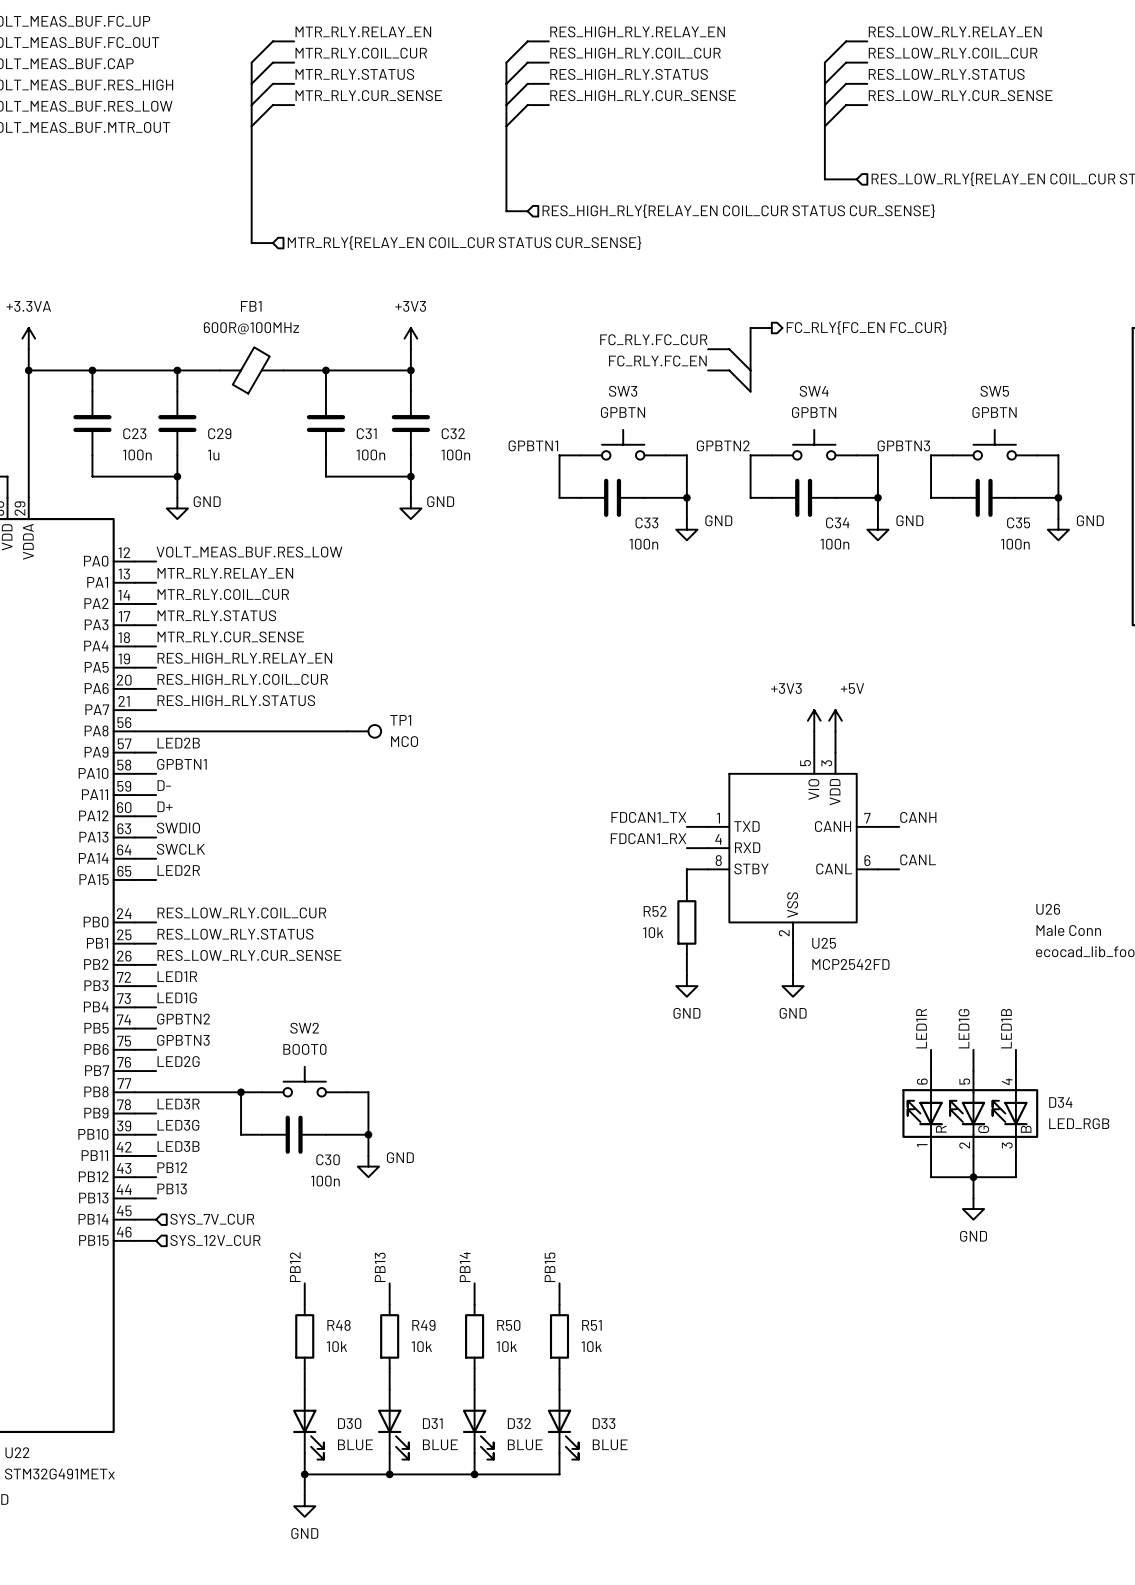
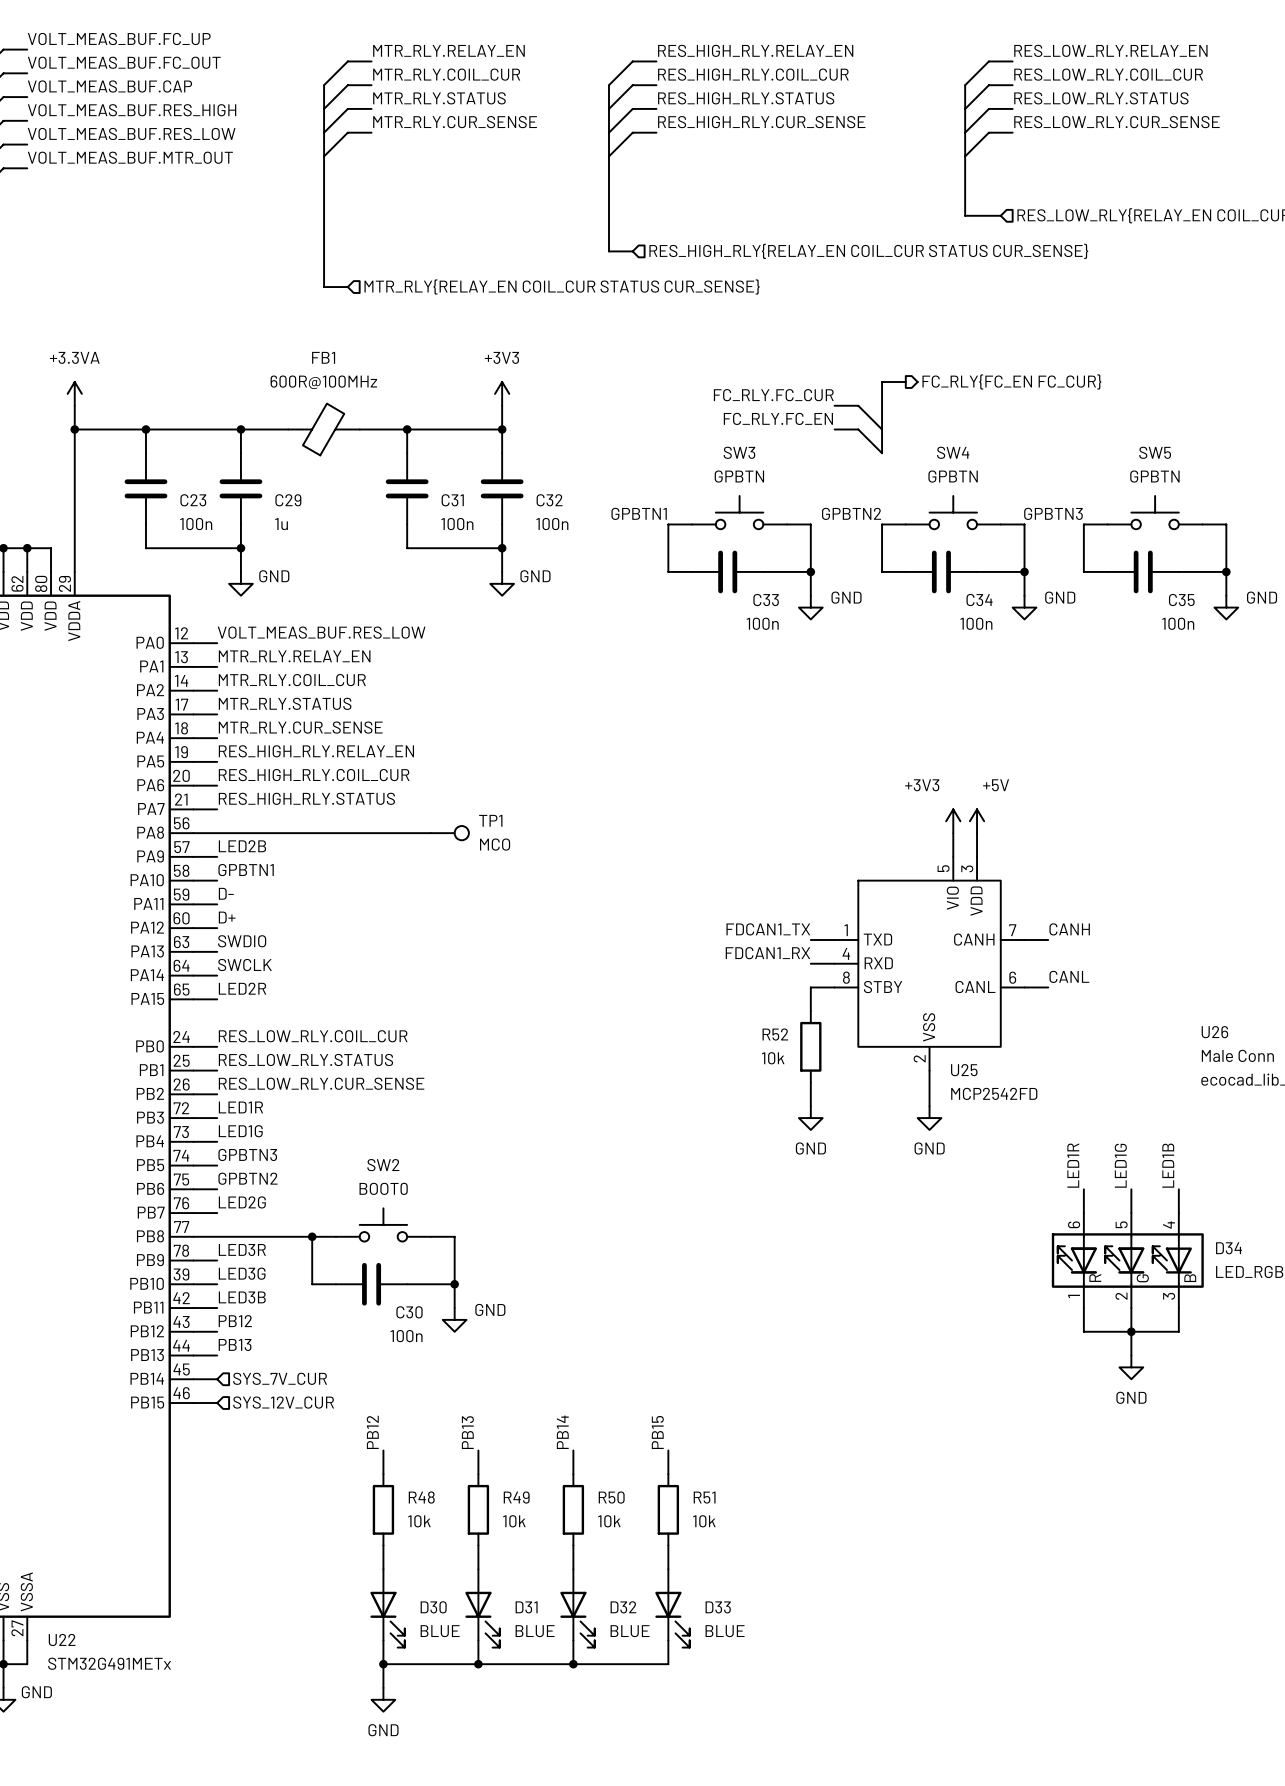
label: GPBTN2 (183, 1019) -> GPBTN3 (247, 1154)
label: GPBTN3 (183, 1040) -> GPBTN2 (247, 1178)

